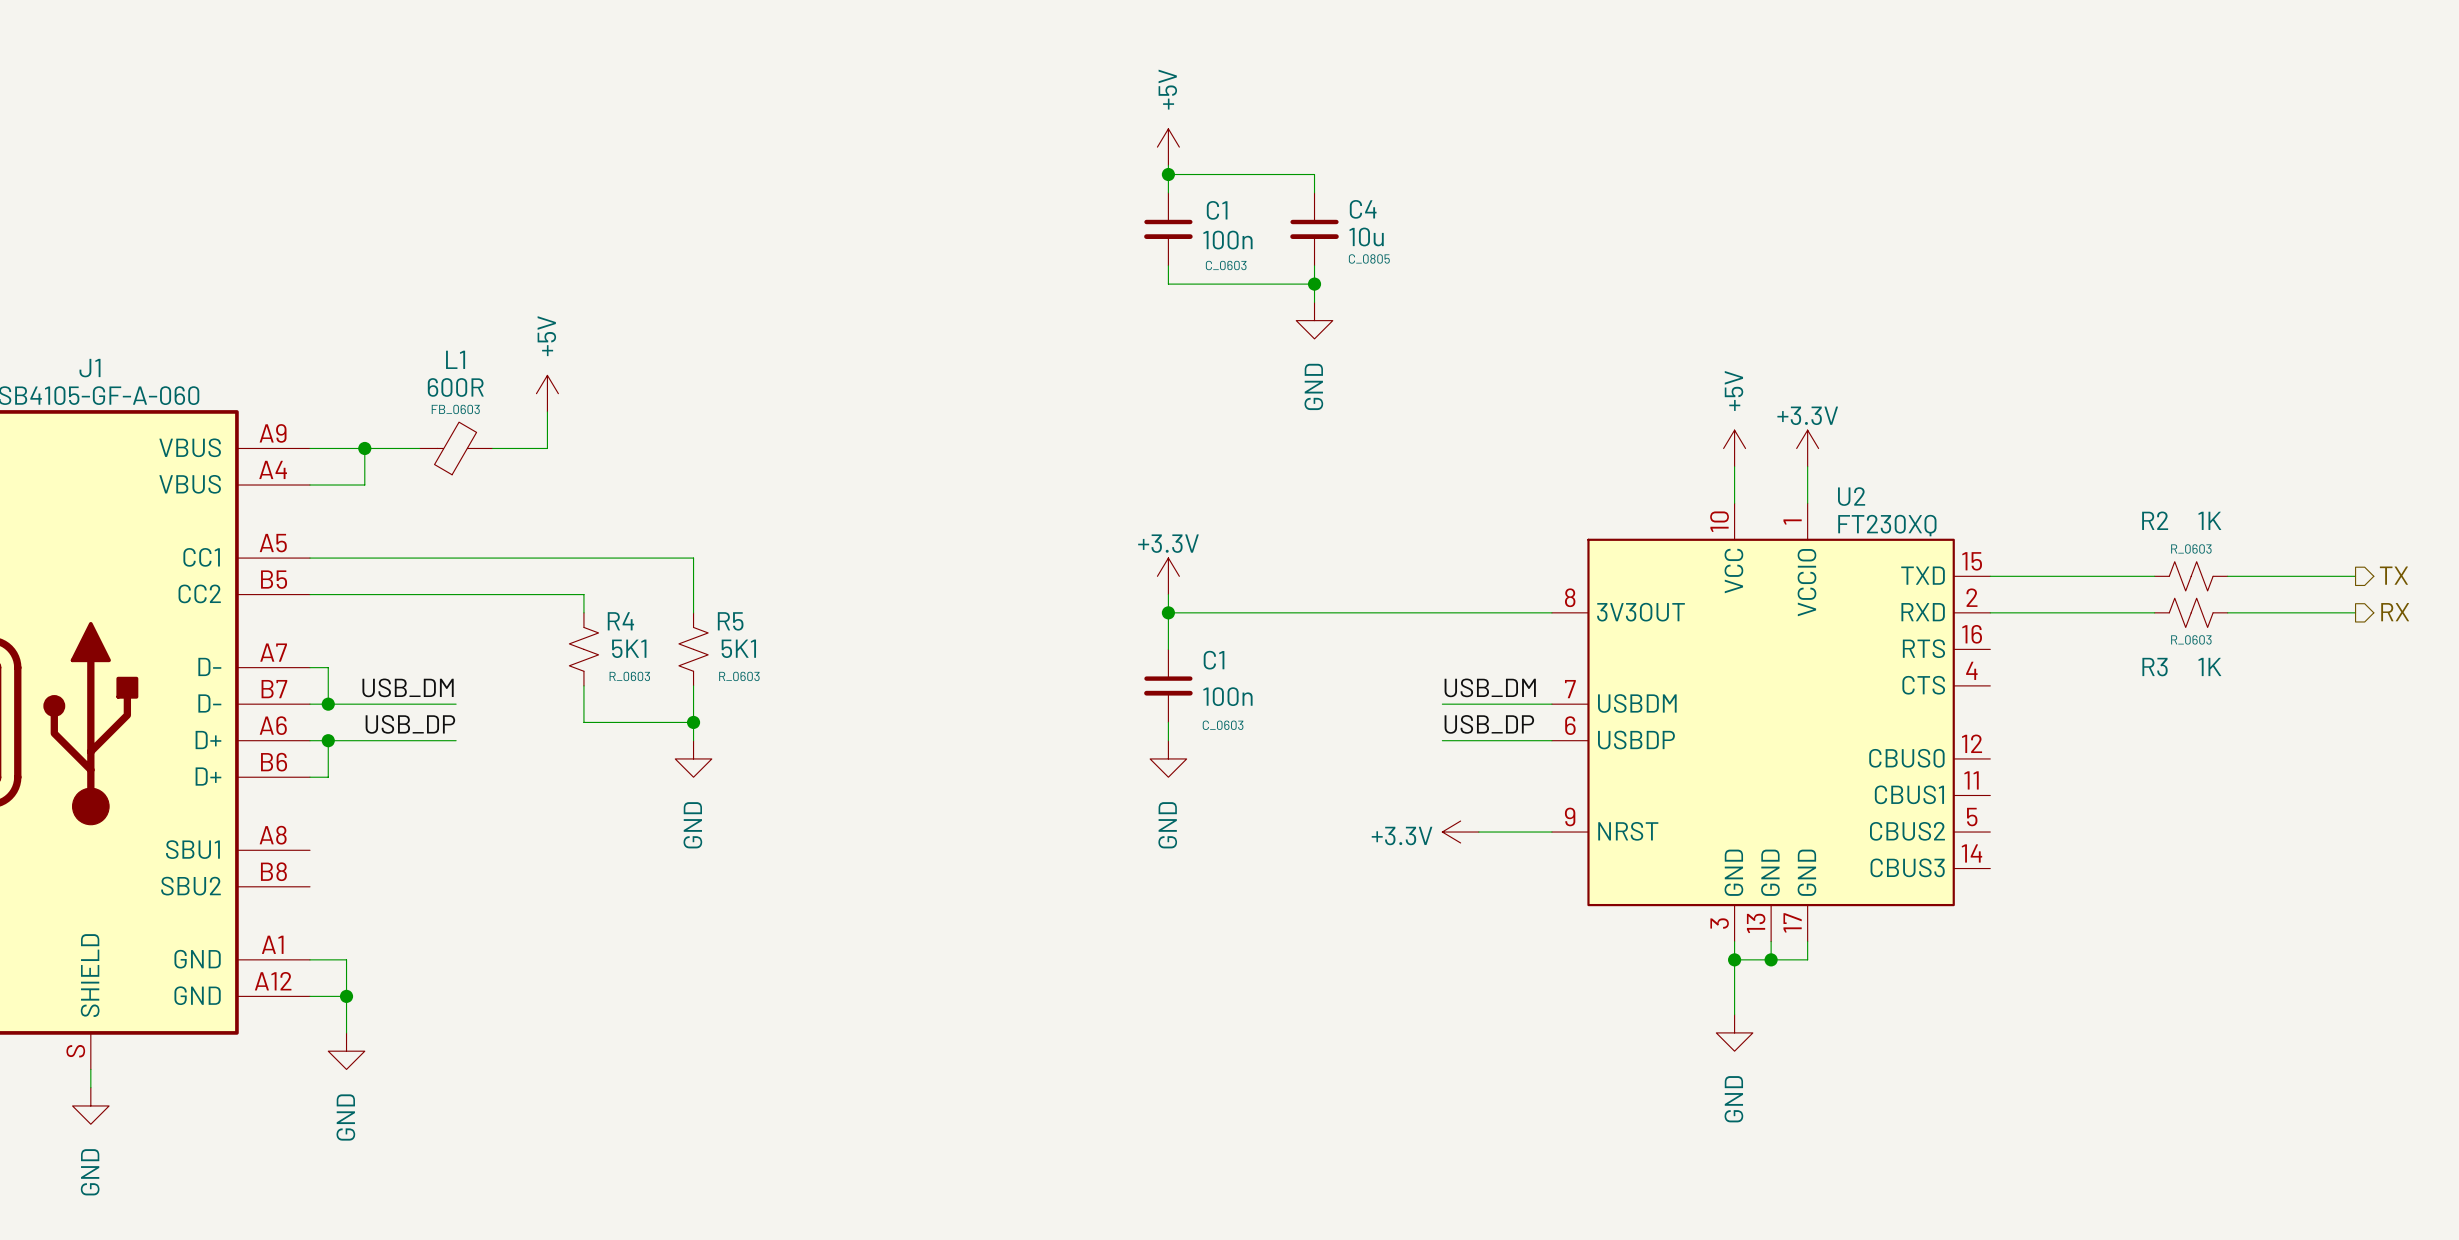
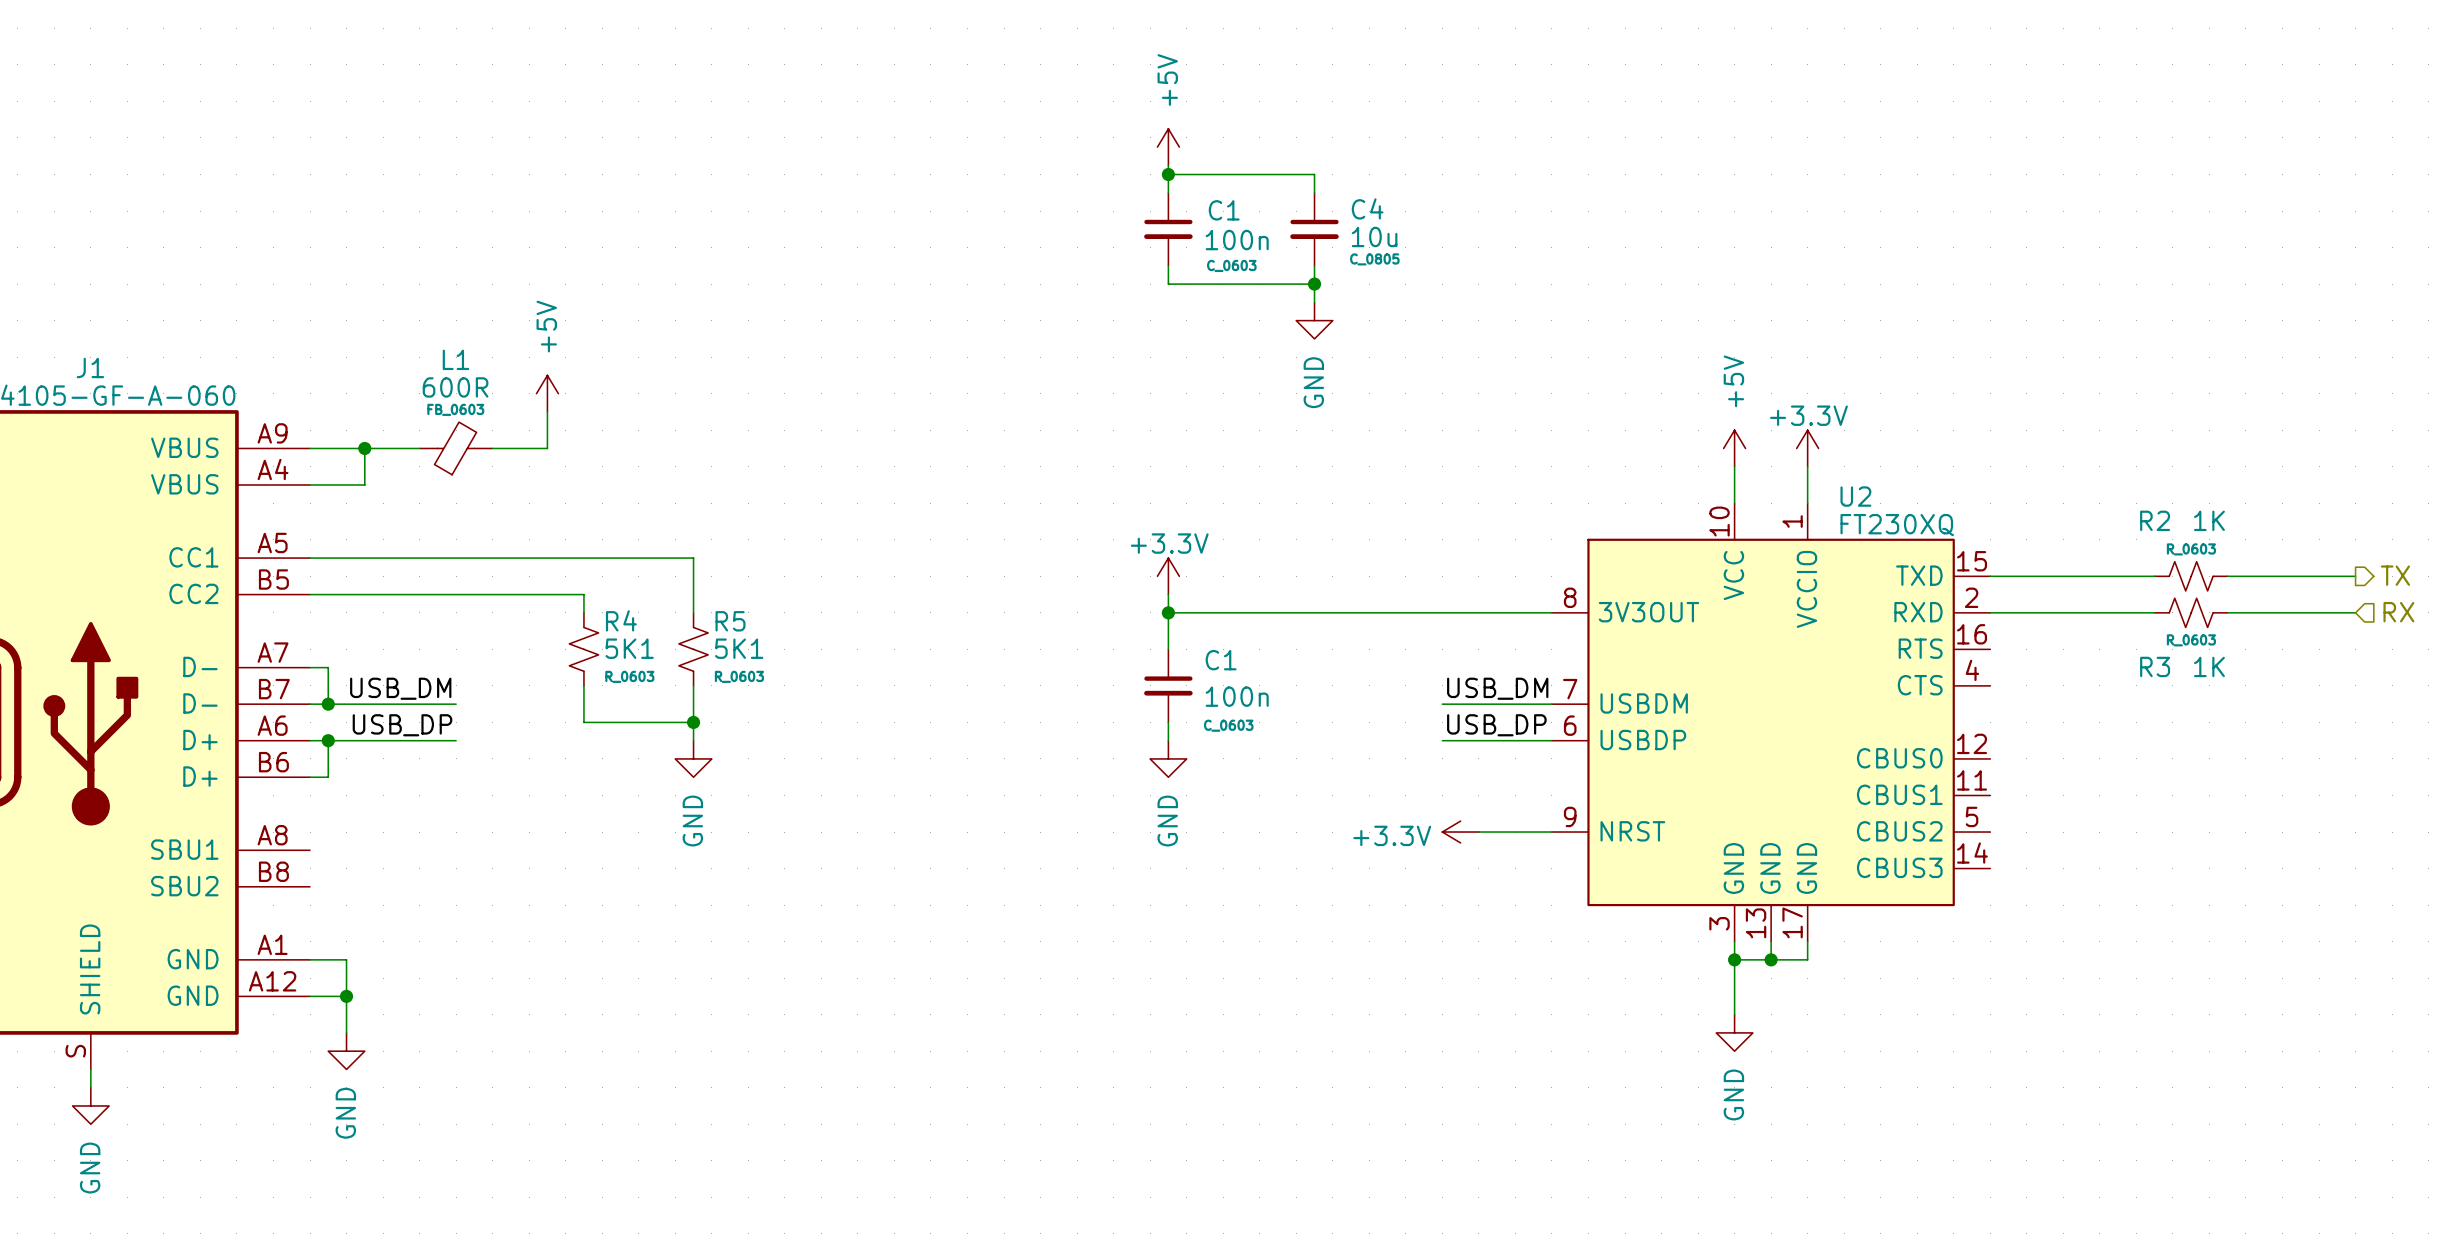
hierarchical label shape: output (2395, 612) -> input (2398, 612)

